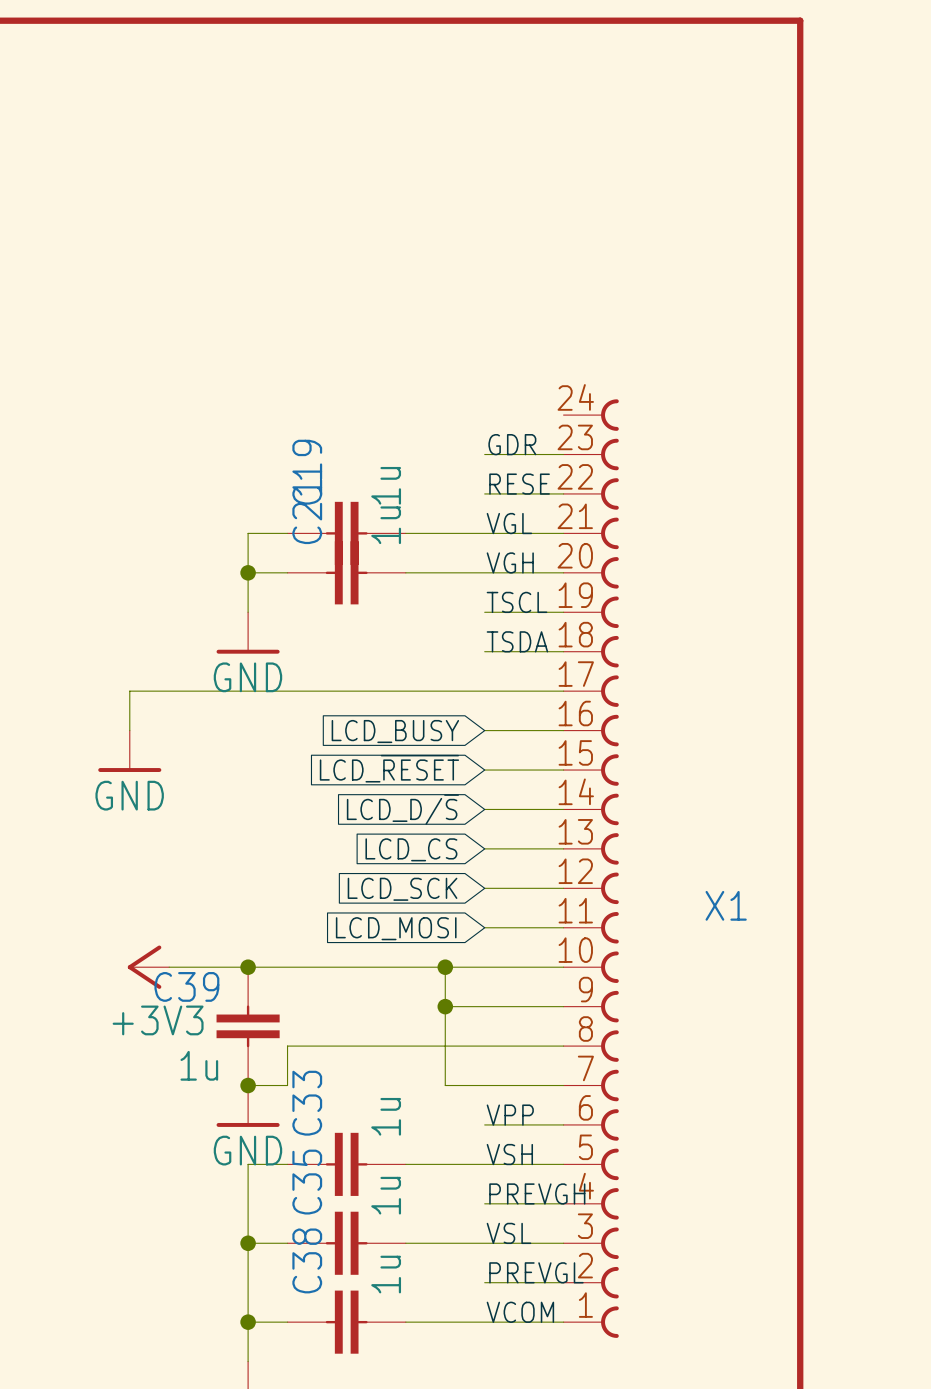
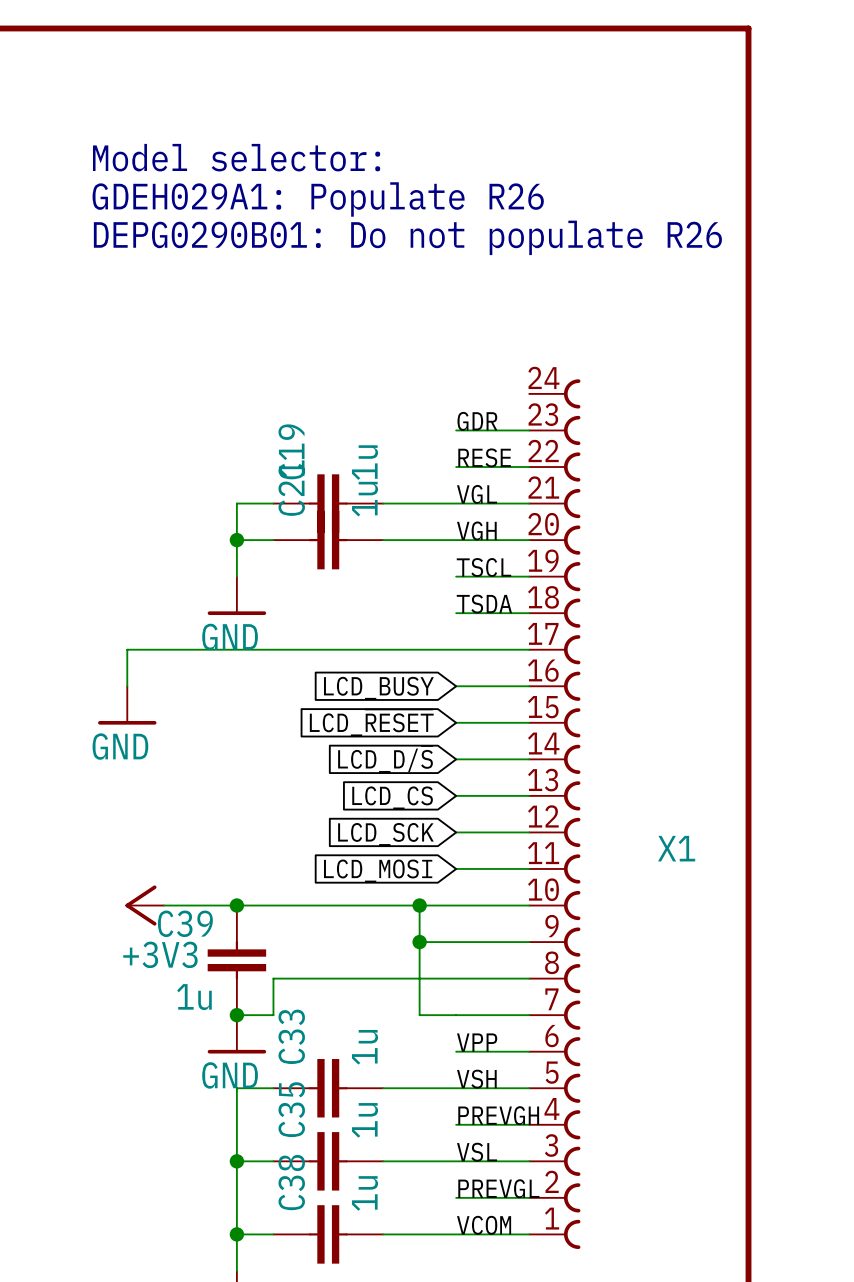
text: none -> Model selector: (236, 157)
text: none -> GDEH029A1: Populate R26 (318, 199)
text: none -> DEPG0290B01: Do not populate R26 (407, 237)

